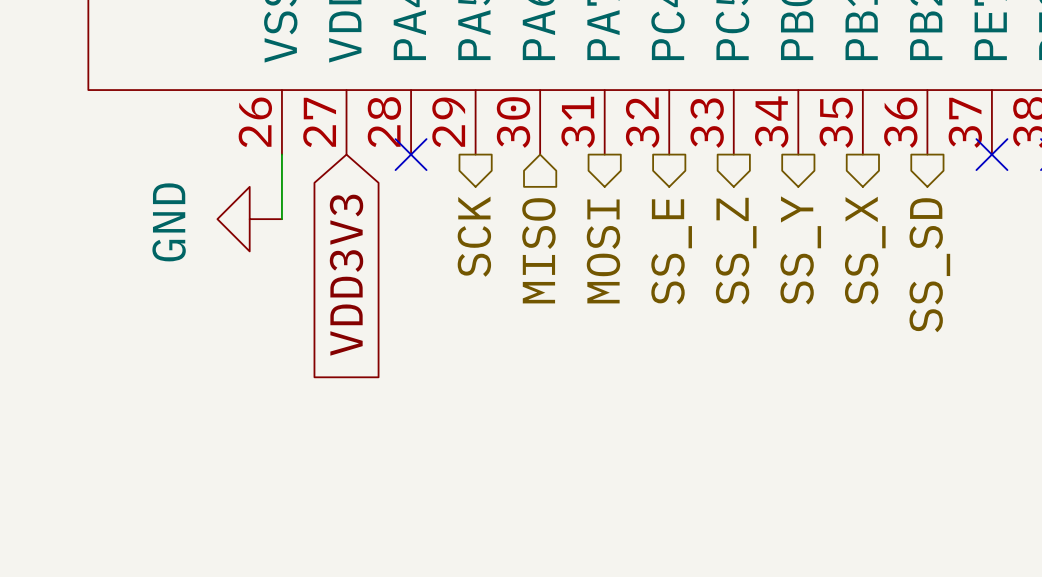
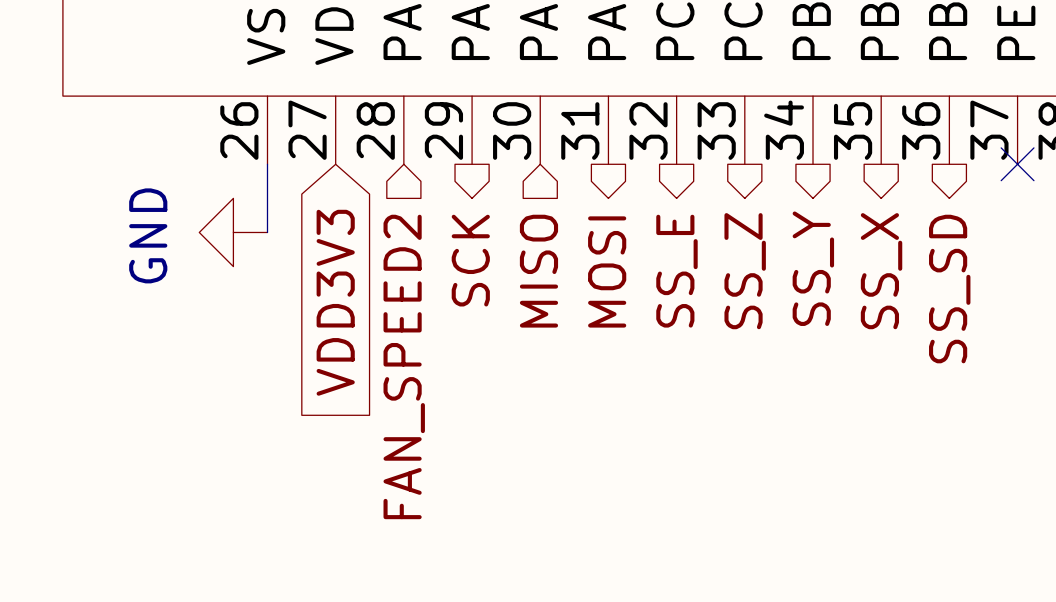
no-connect mark: (411, 154) -> none
hierarchical label: none -> FAN_SPEED2 (404, 366)

